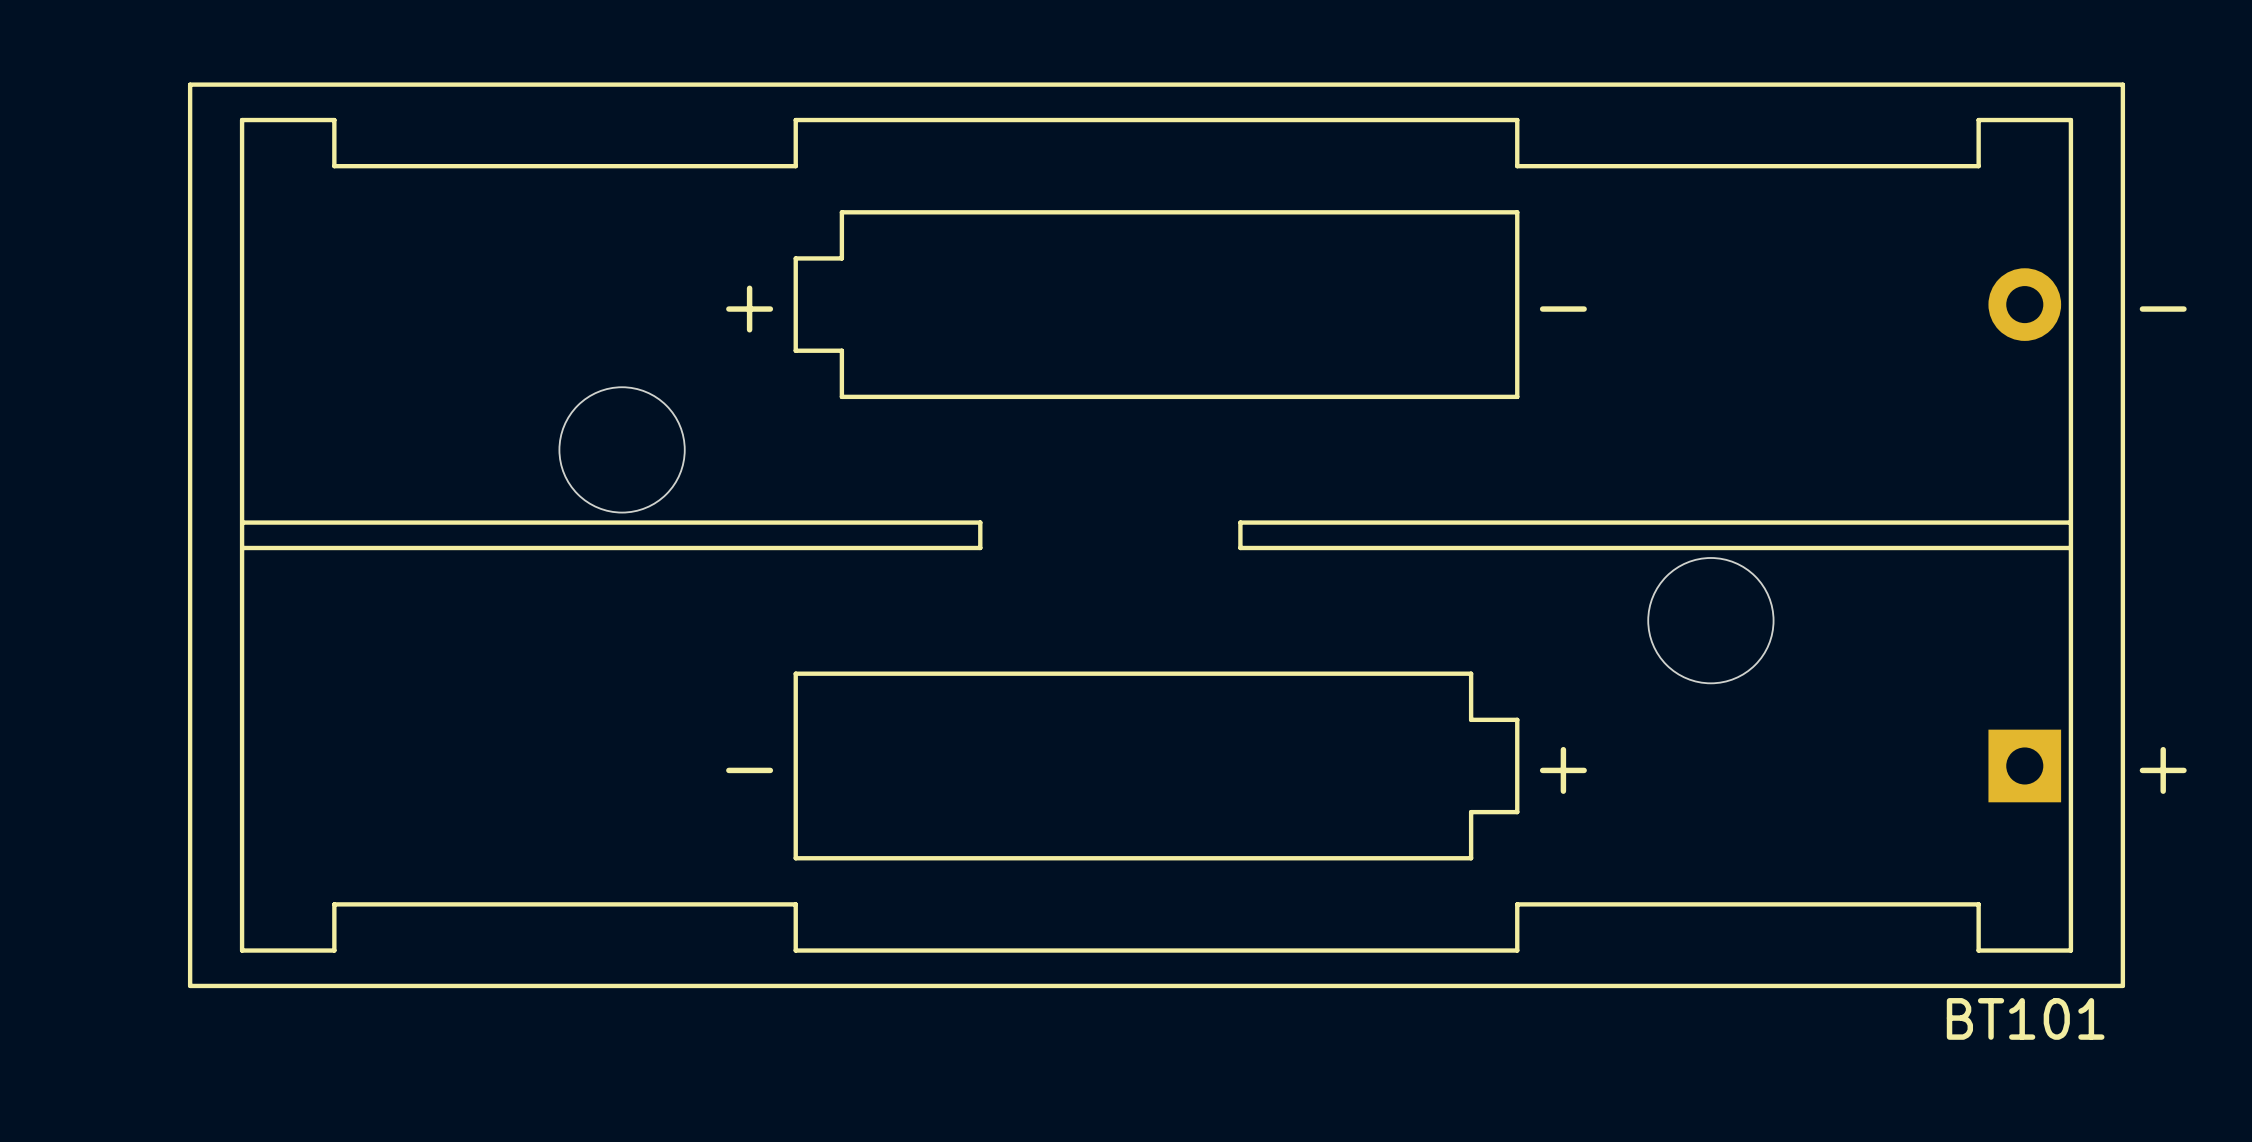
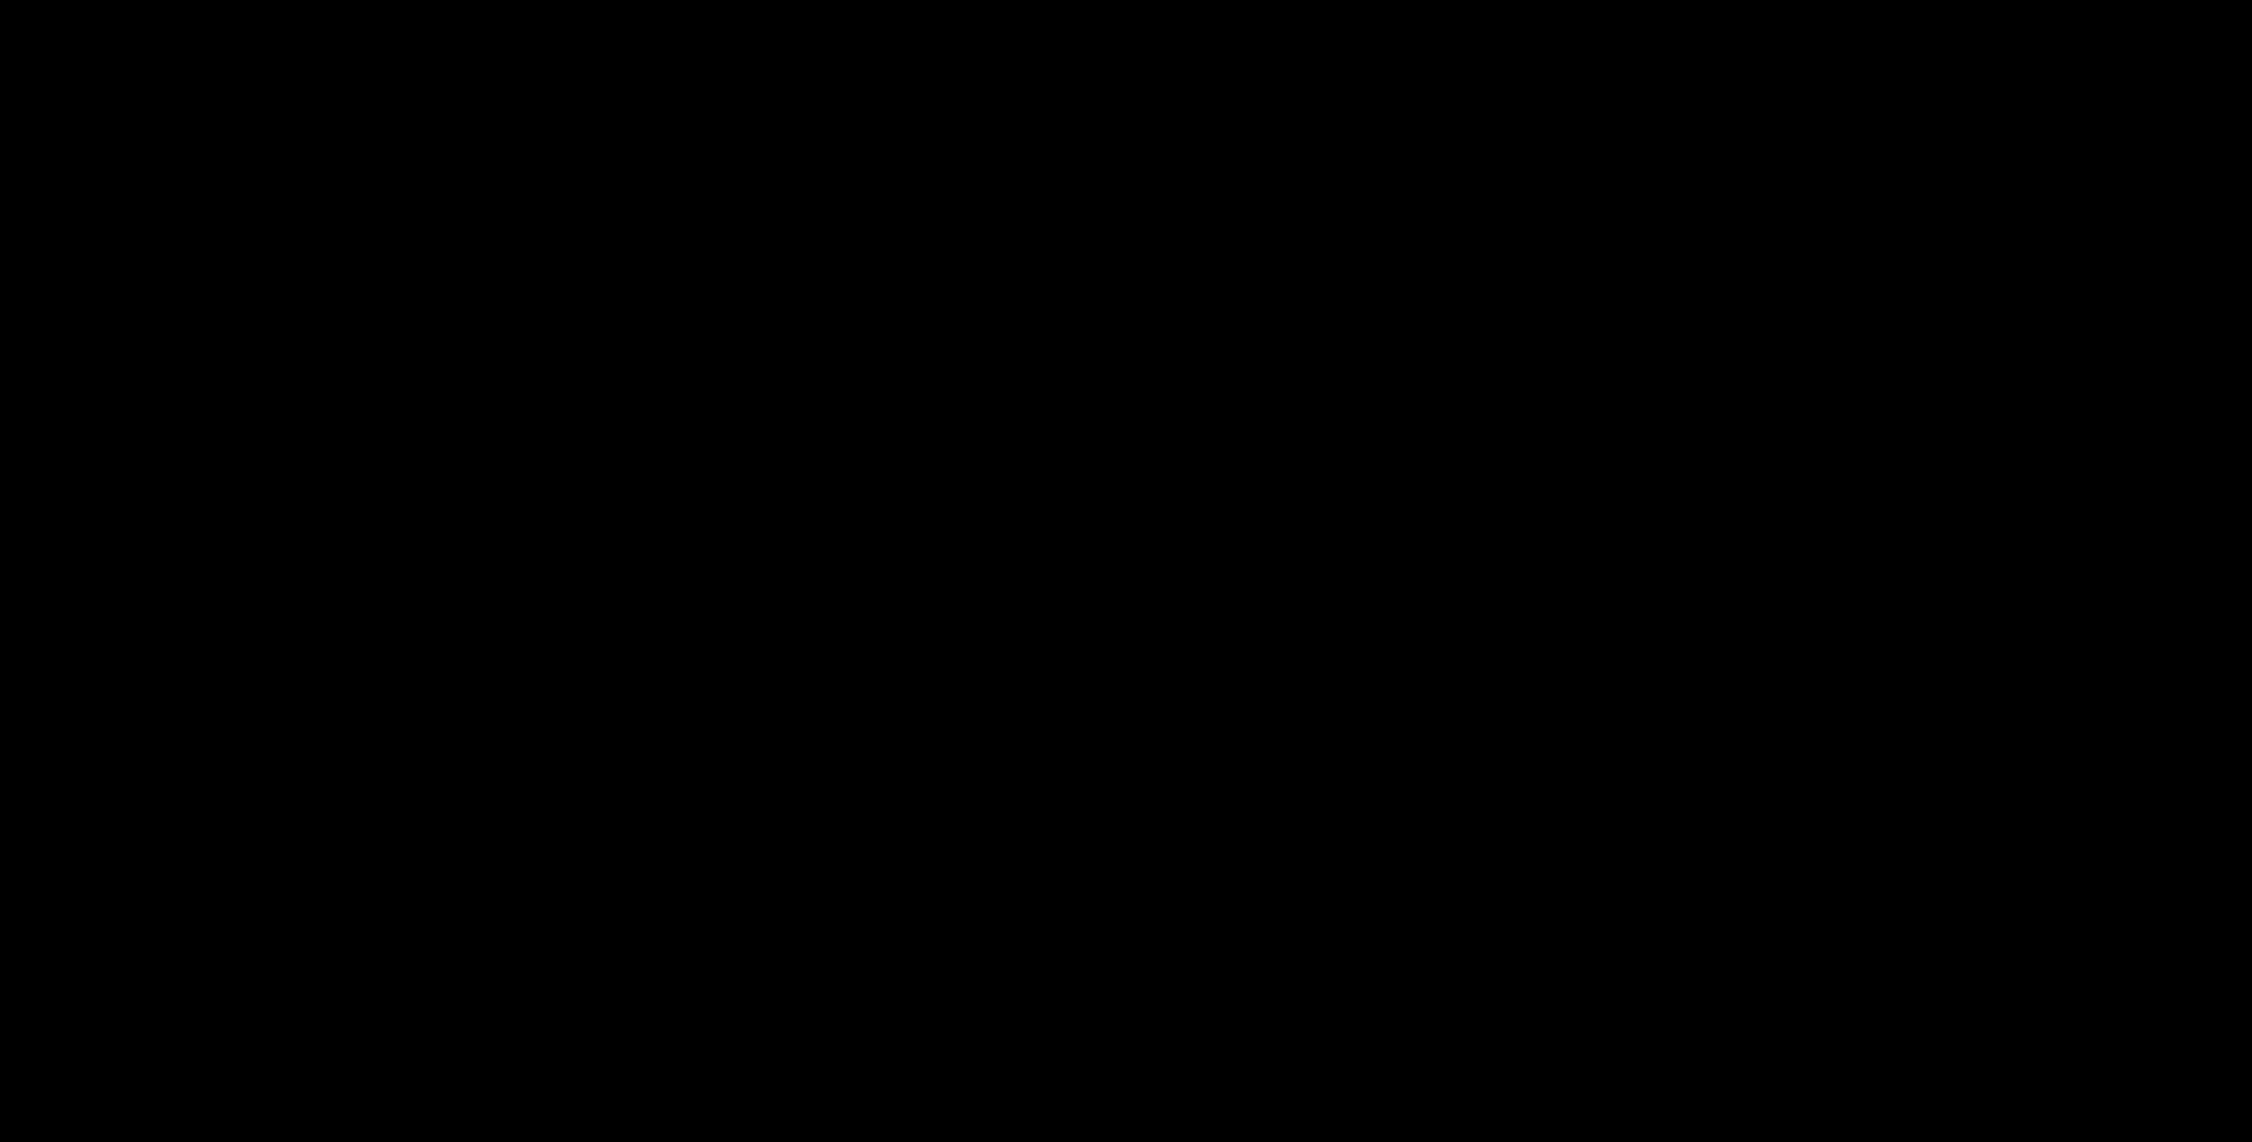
BT101: (1156, 535) -> none

